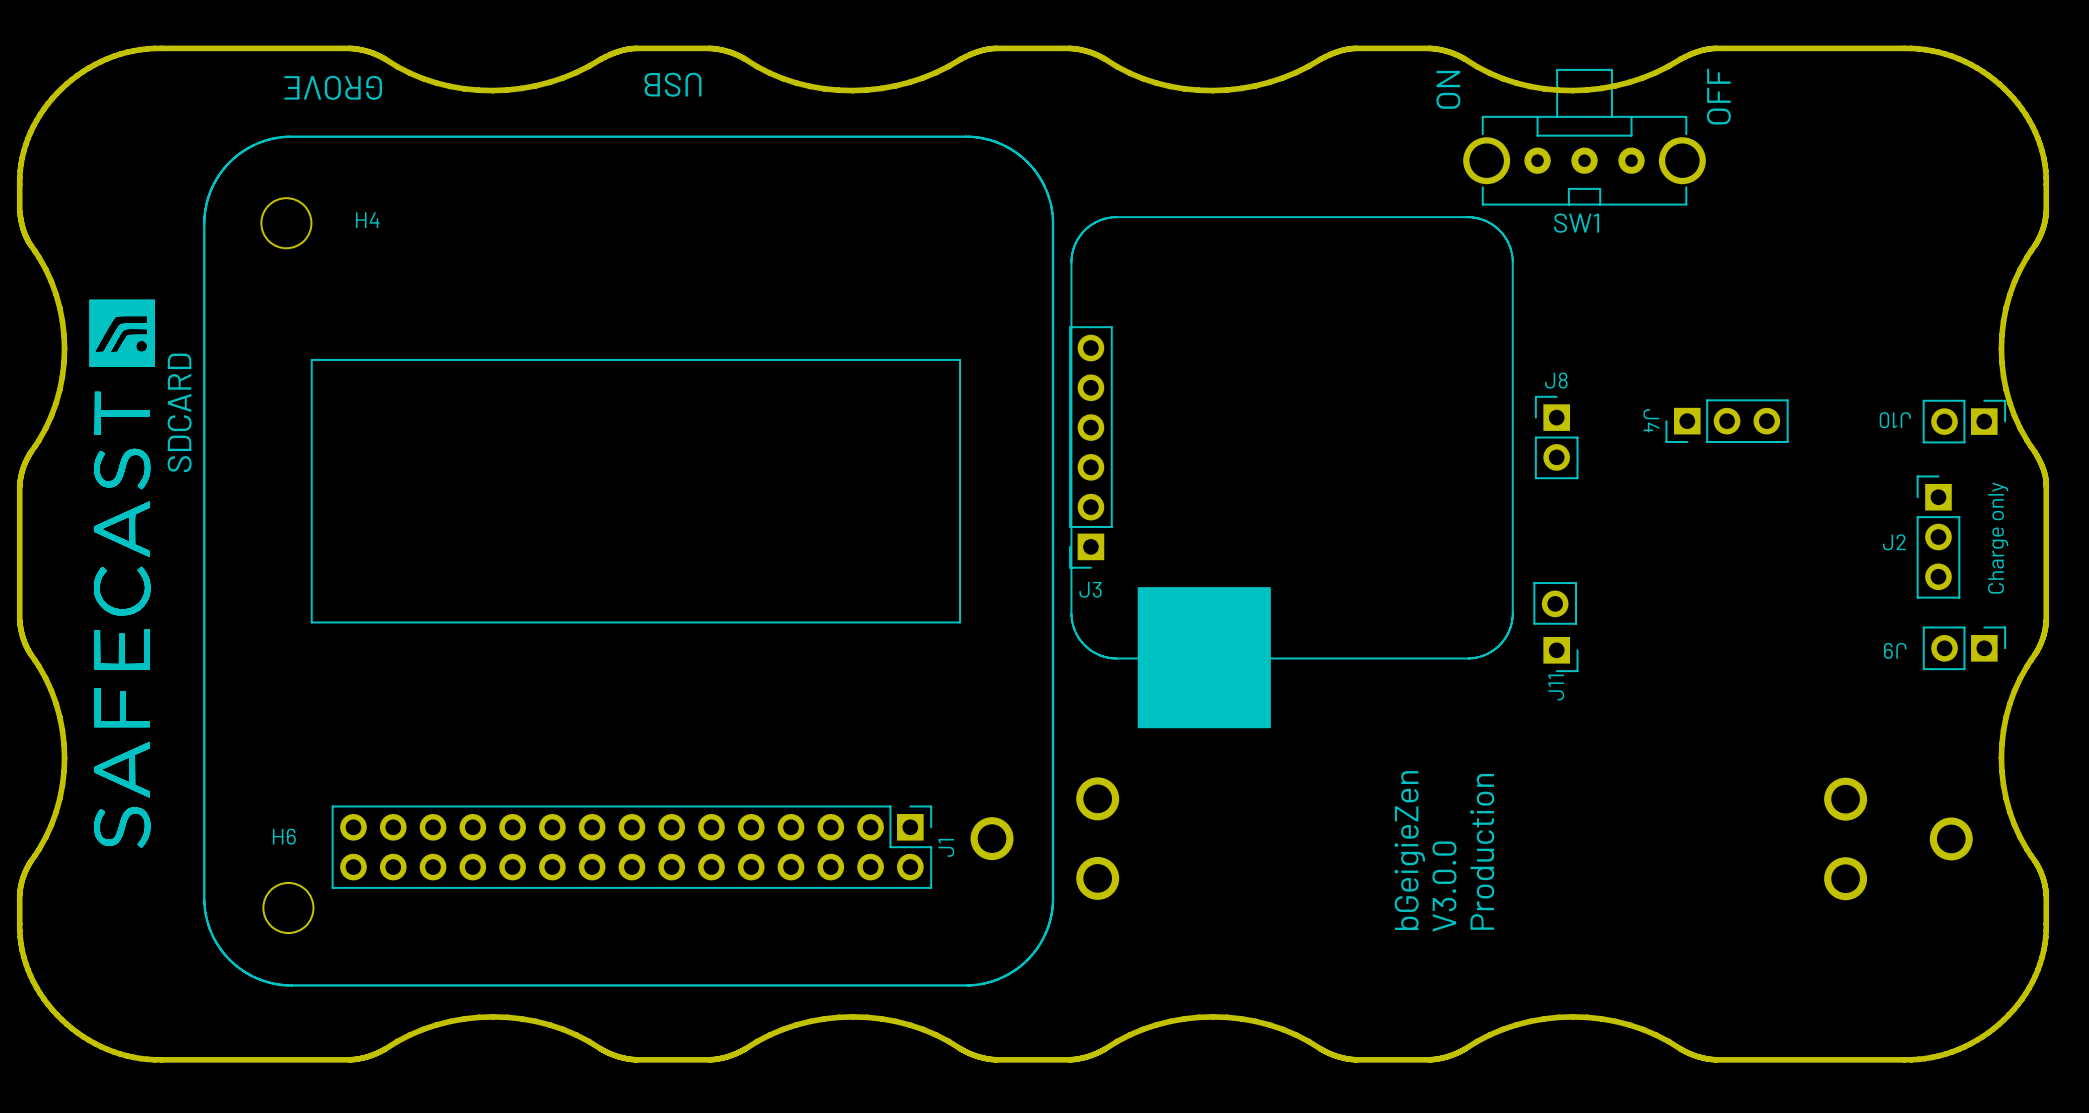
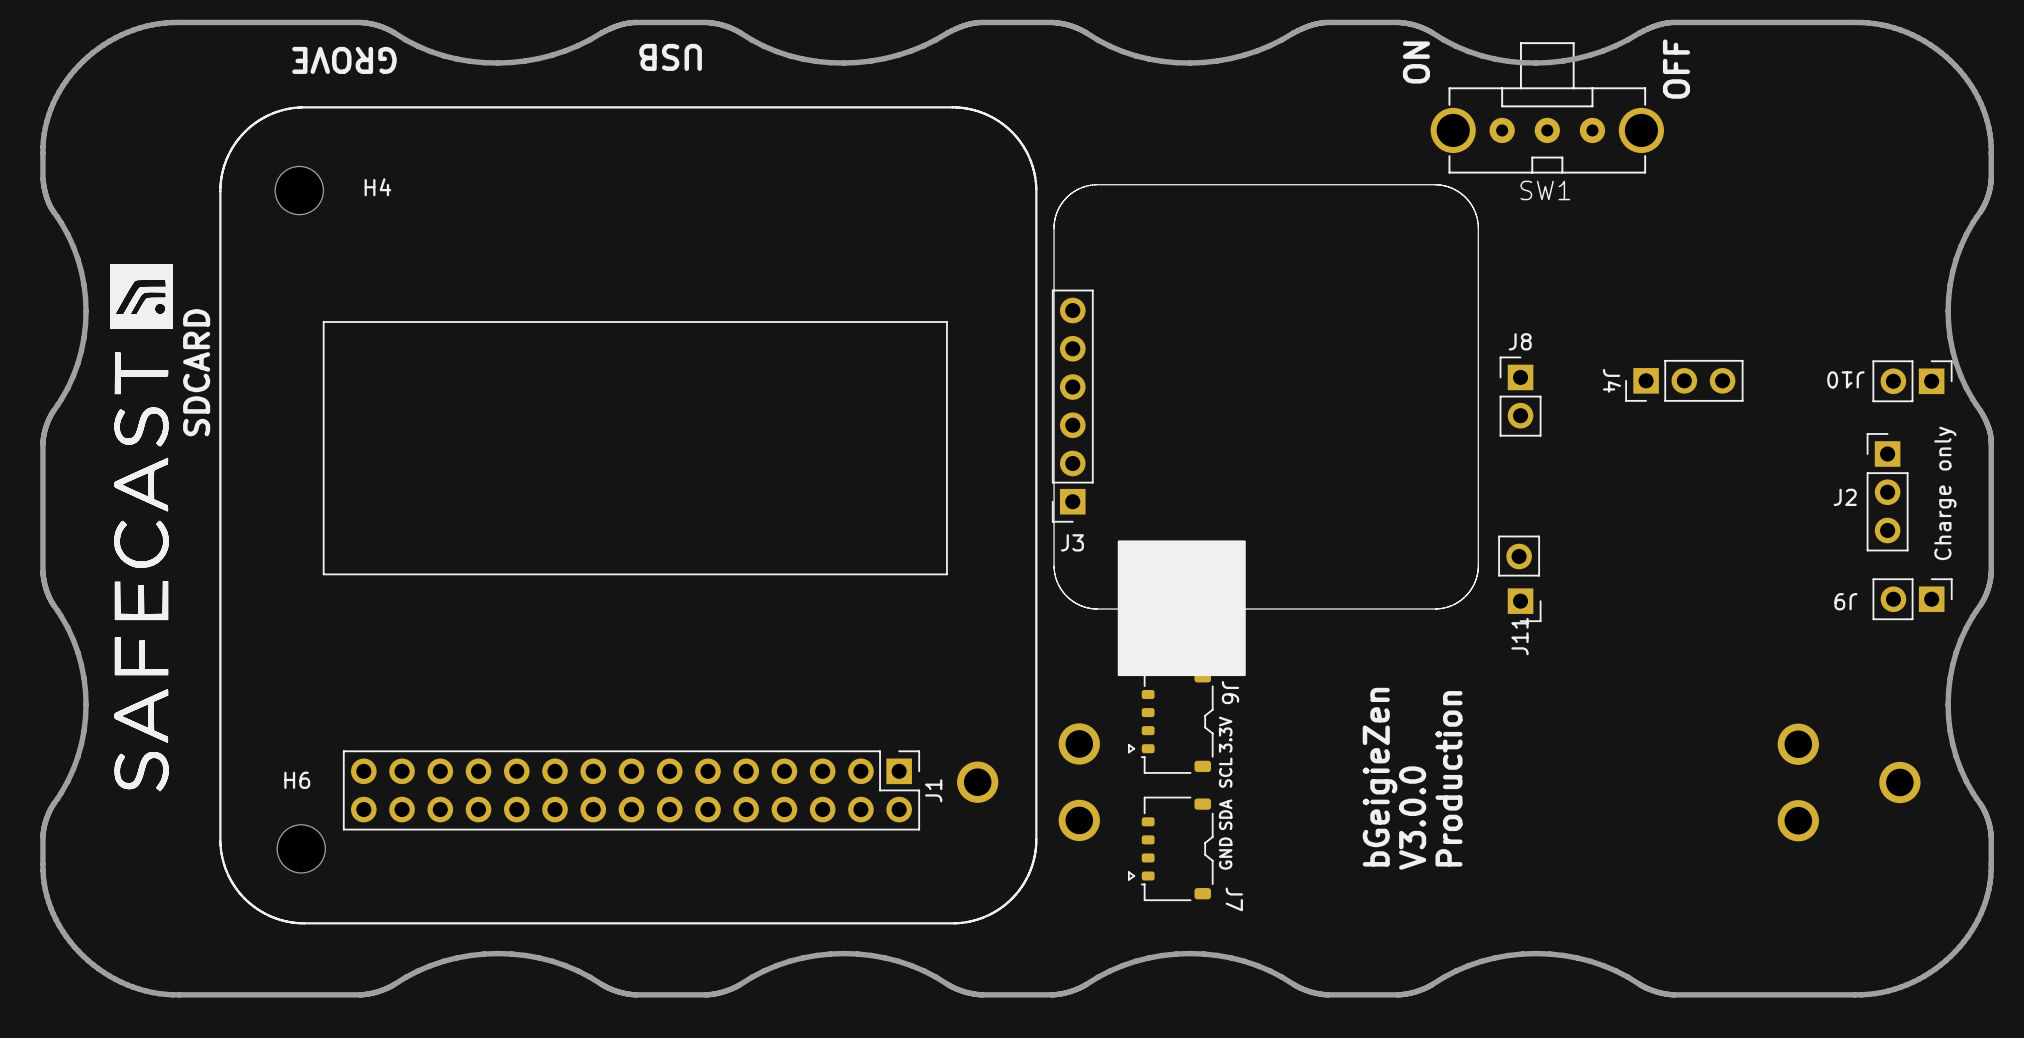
J6: none -> (1170, 721)
text: none -> 3.3V (1225, 734)
text: none -> SCL (1225, 772)
text: none -> SDA (1225, 814)
J7: none -> (1170, 848)
text: none -> GND (1225, 853)

